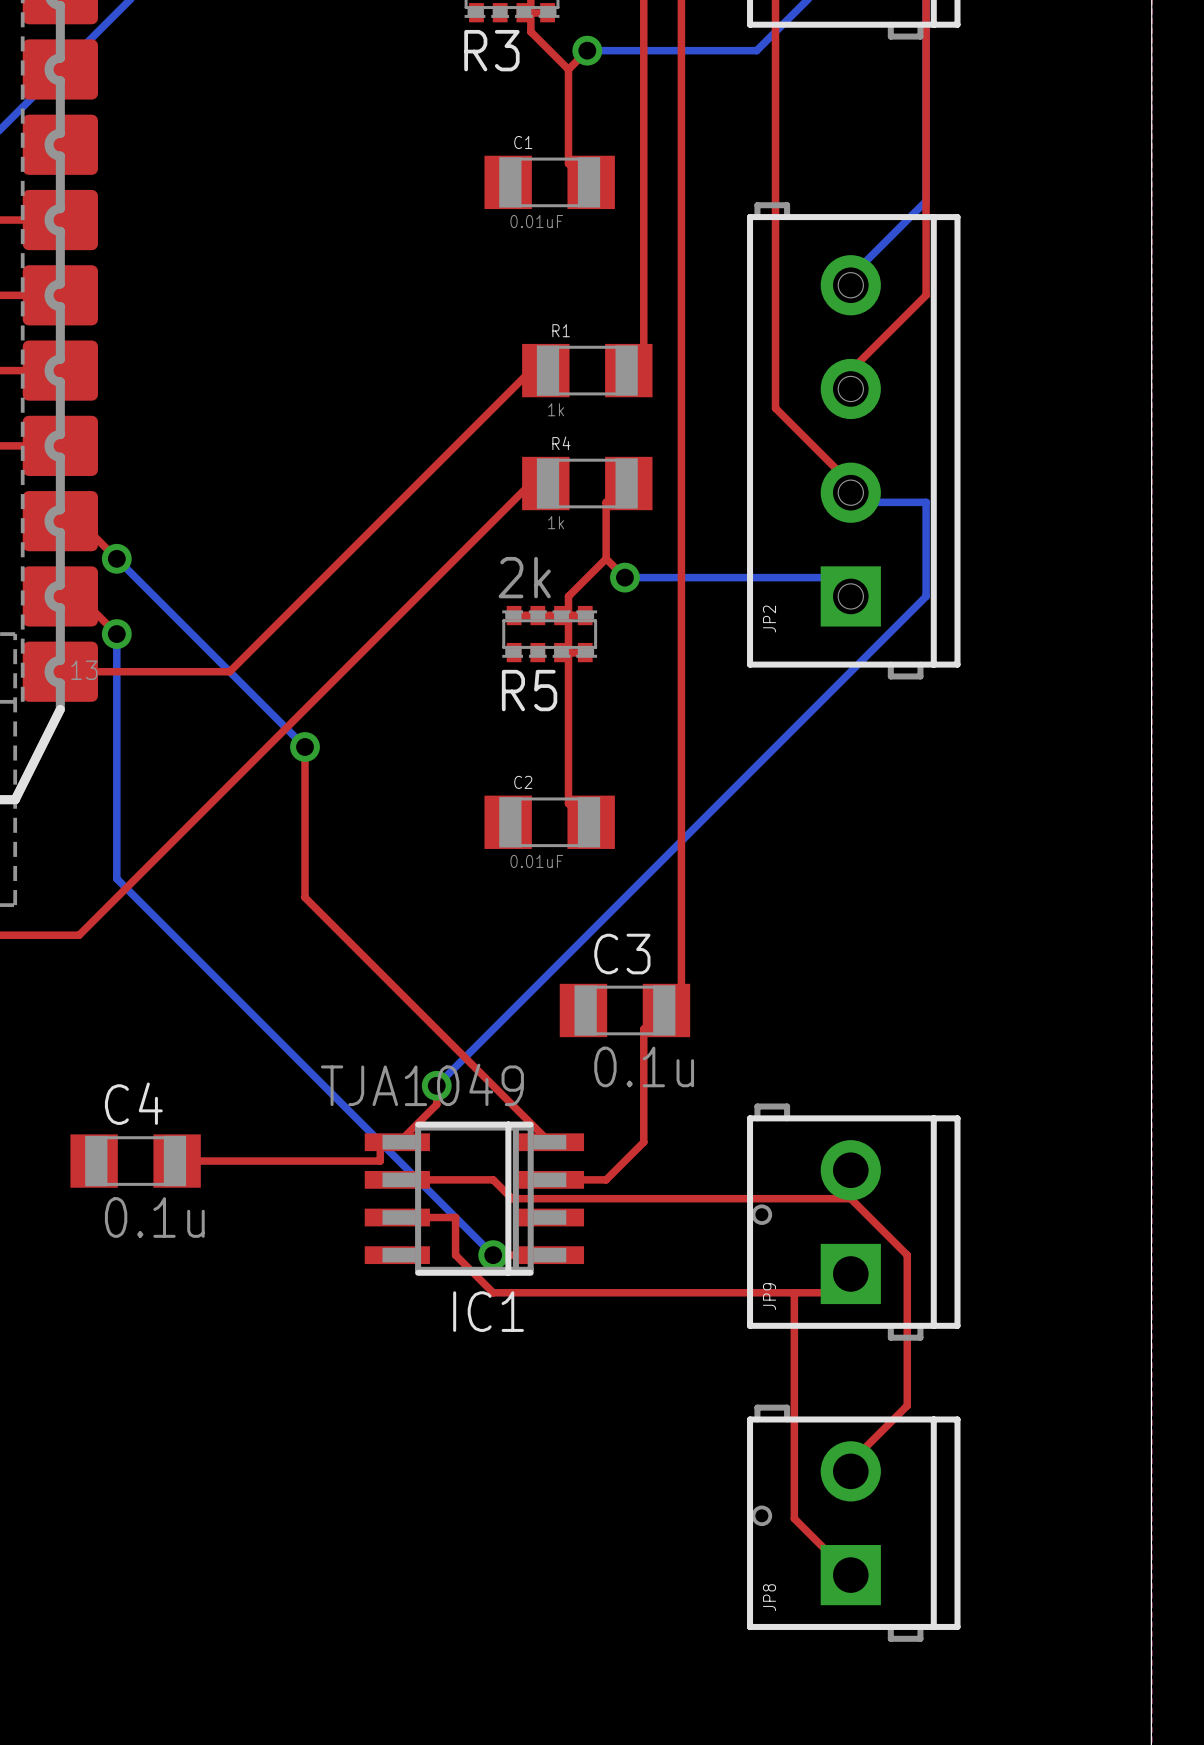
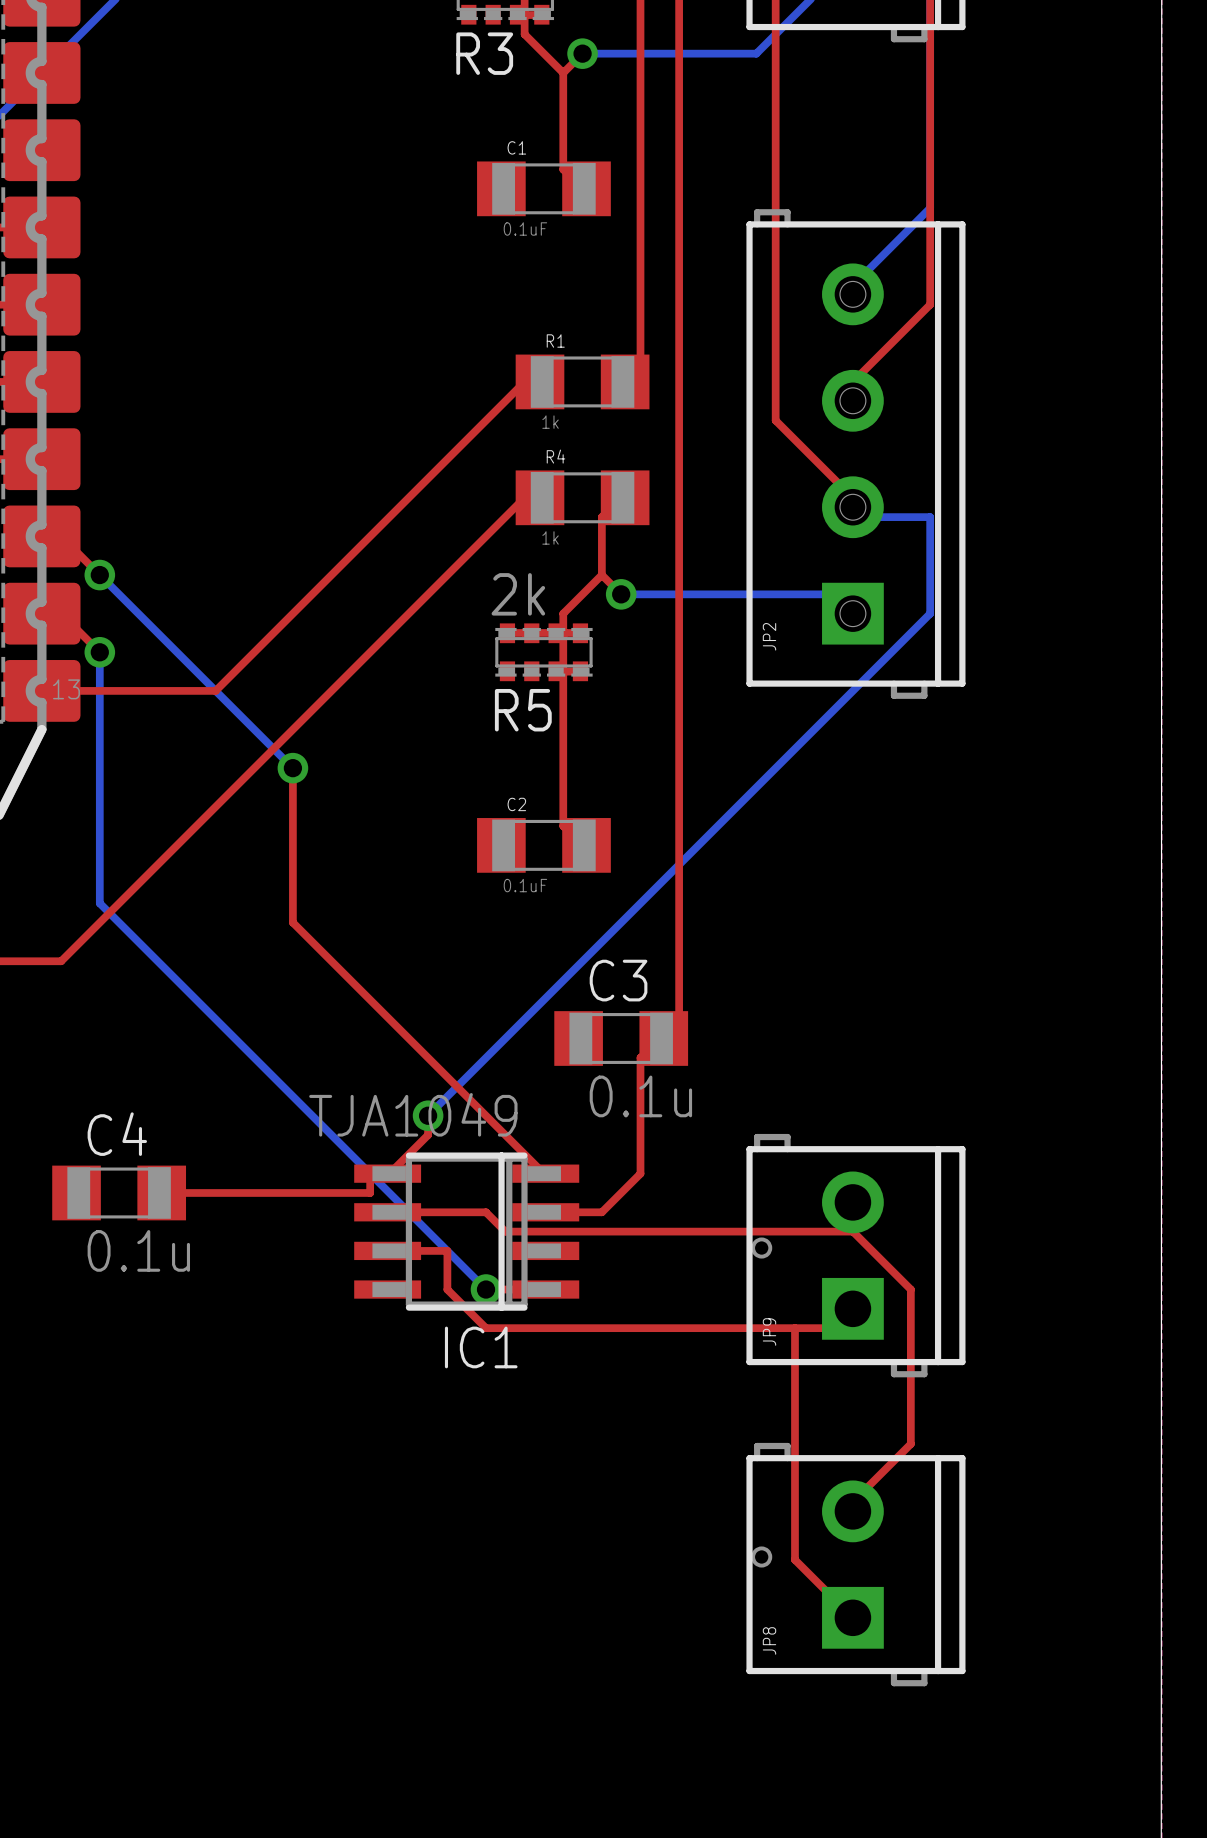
C1 value: 0.01uF (536, 221) -> 0.1uF (525, 229)
C2 value: 0.01uF (536, 861) -> 0.1uF (525, 885)

